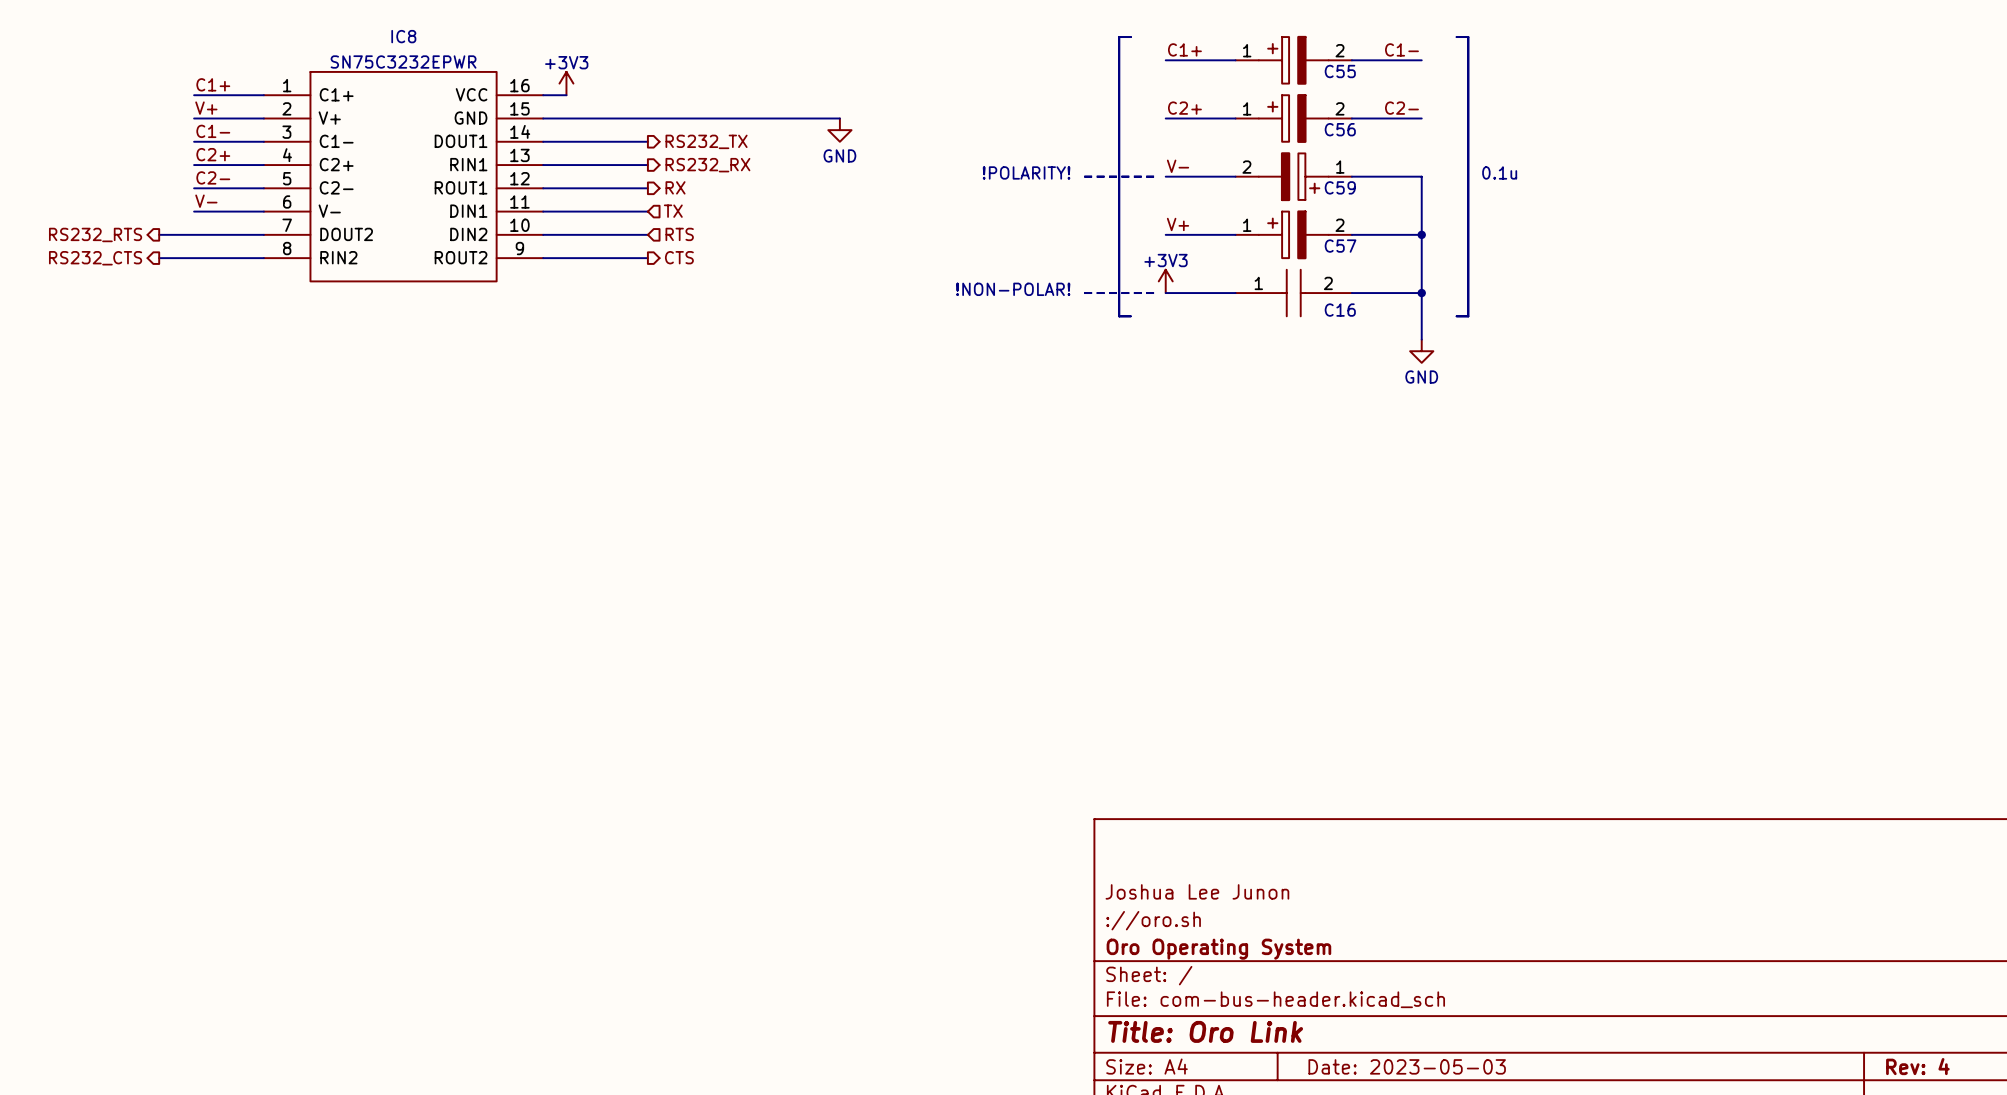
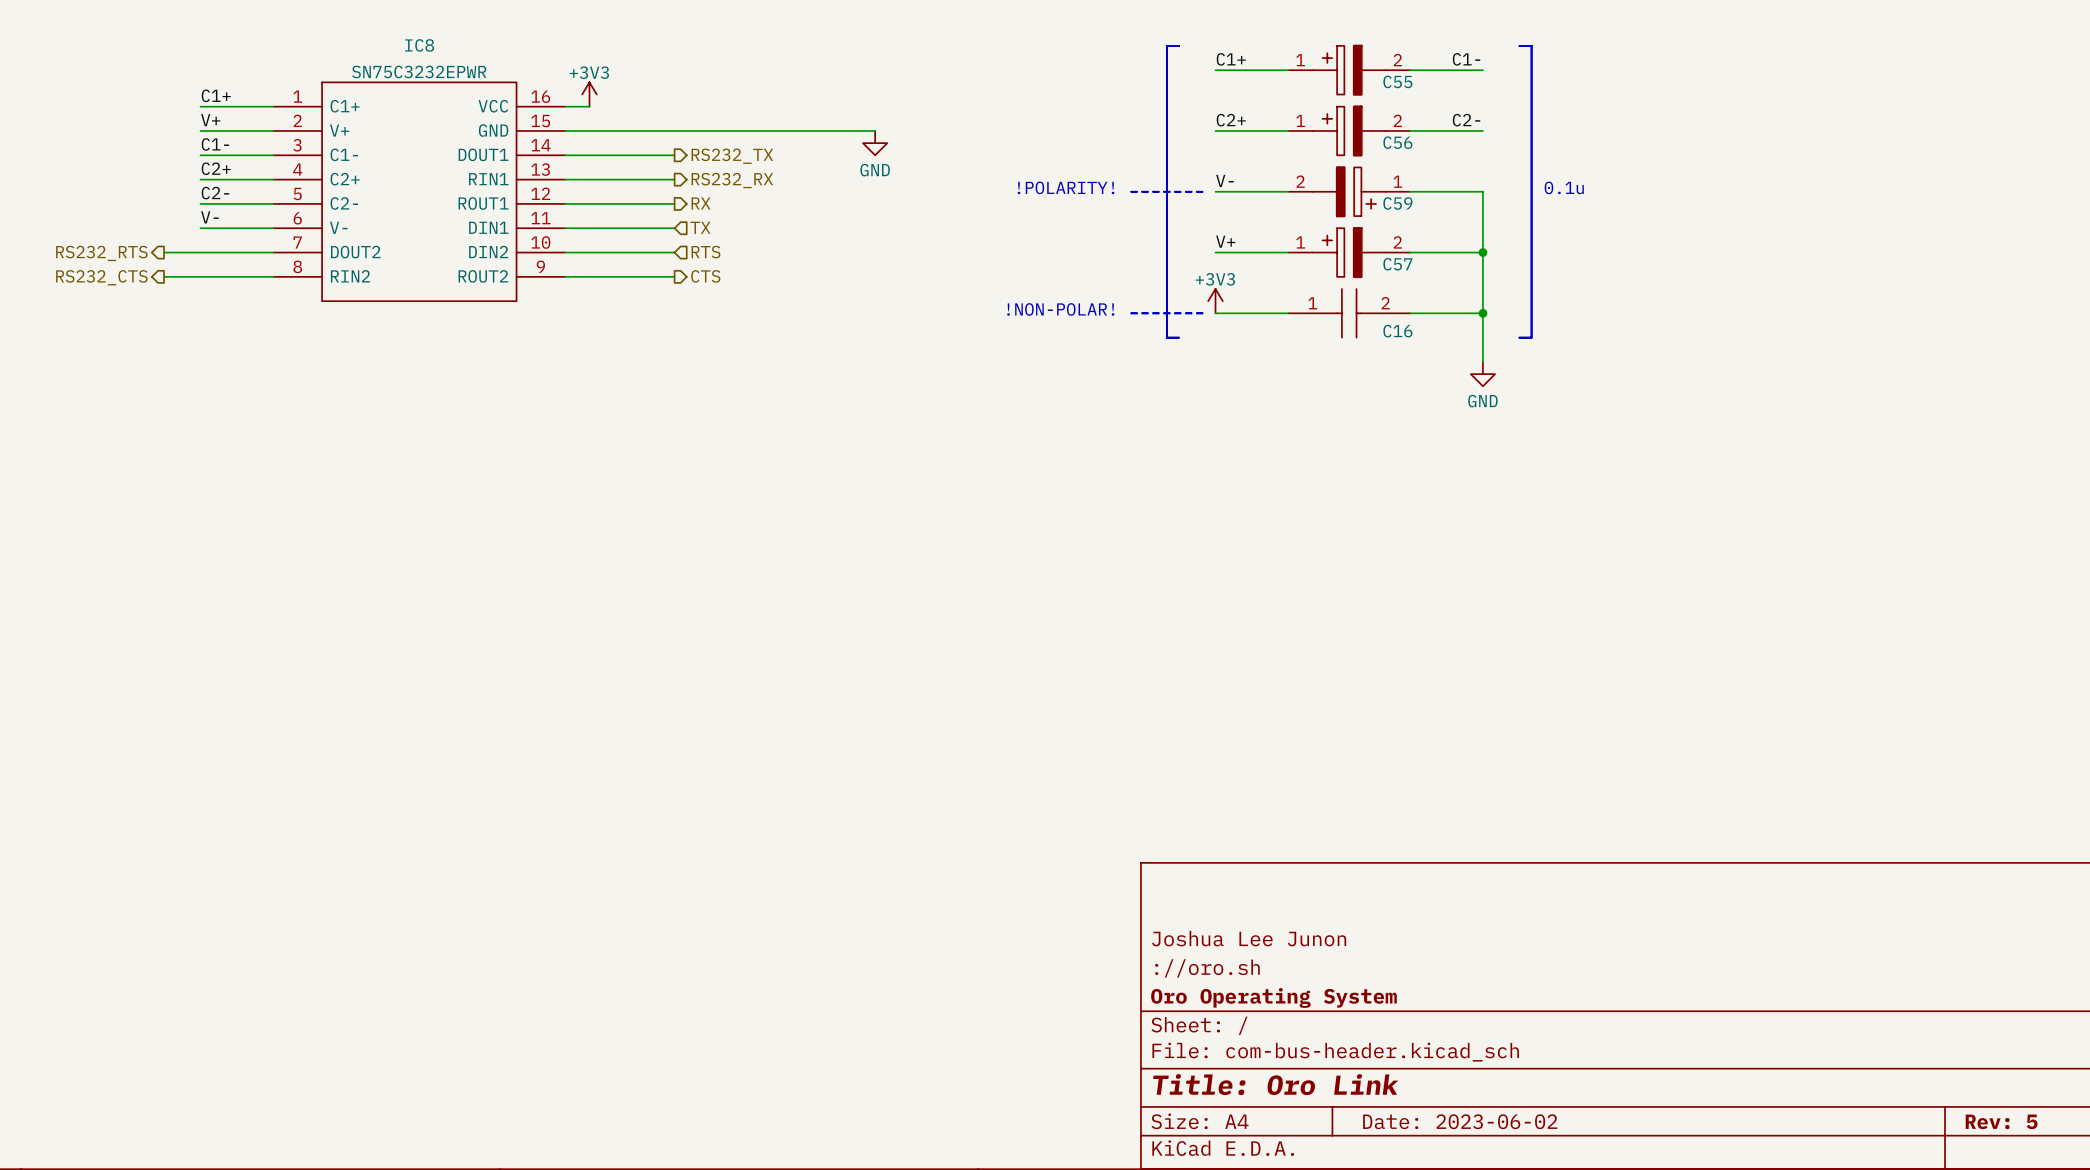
title block: Date: 2023-05-03 (1407, 1066) -> Date: 2023-06-02 (1460, 1121)
title block: Rev: 4 (1917, 1066) -> Rev: 5 (2001, 1121)

